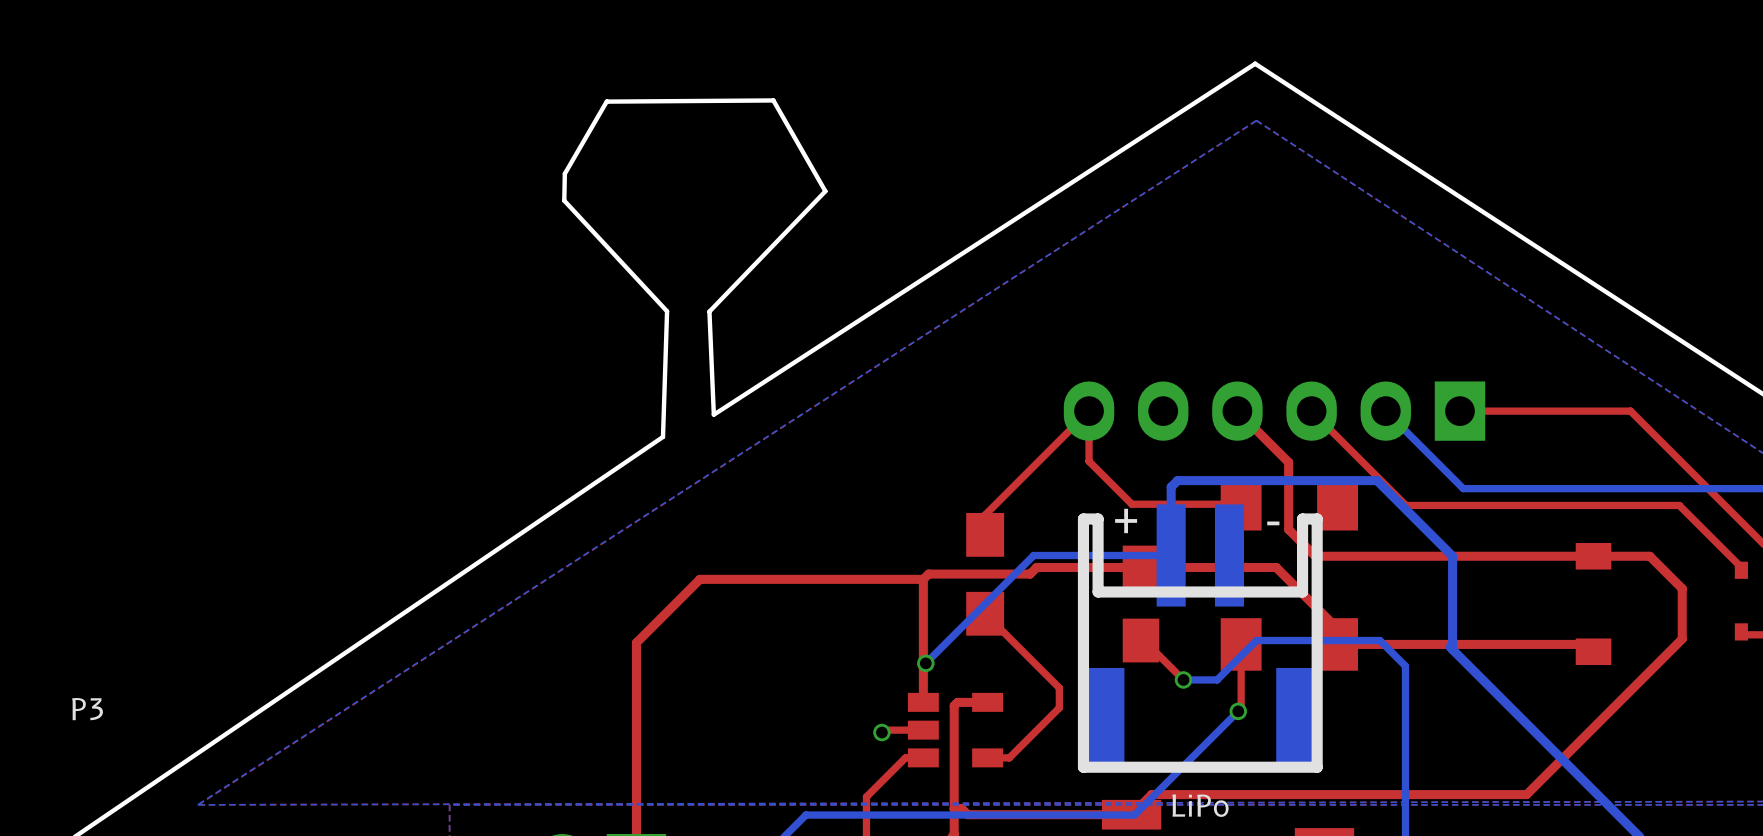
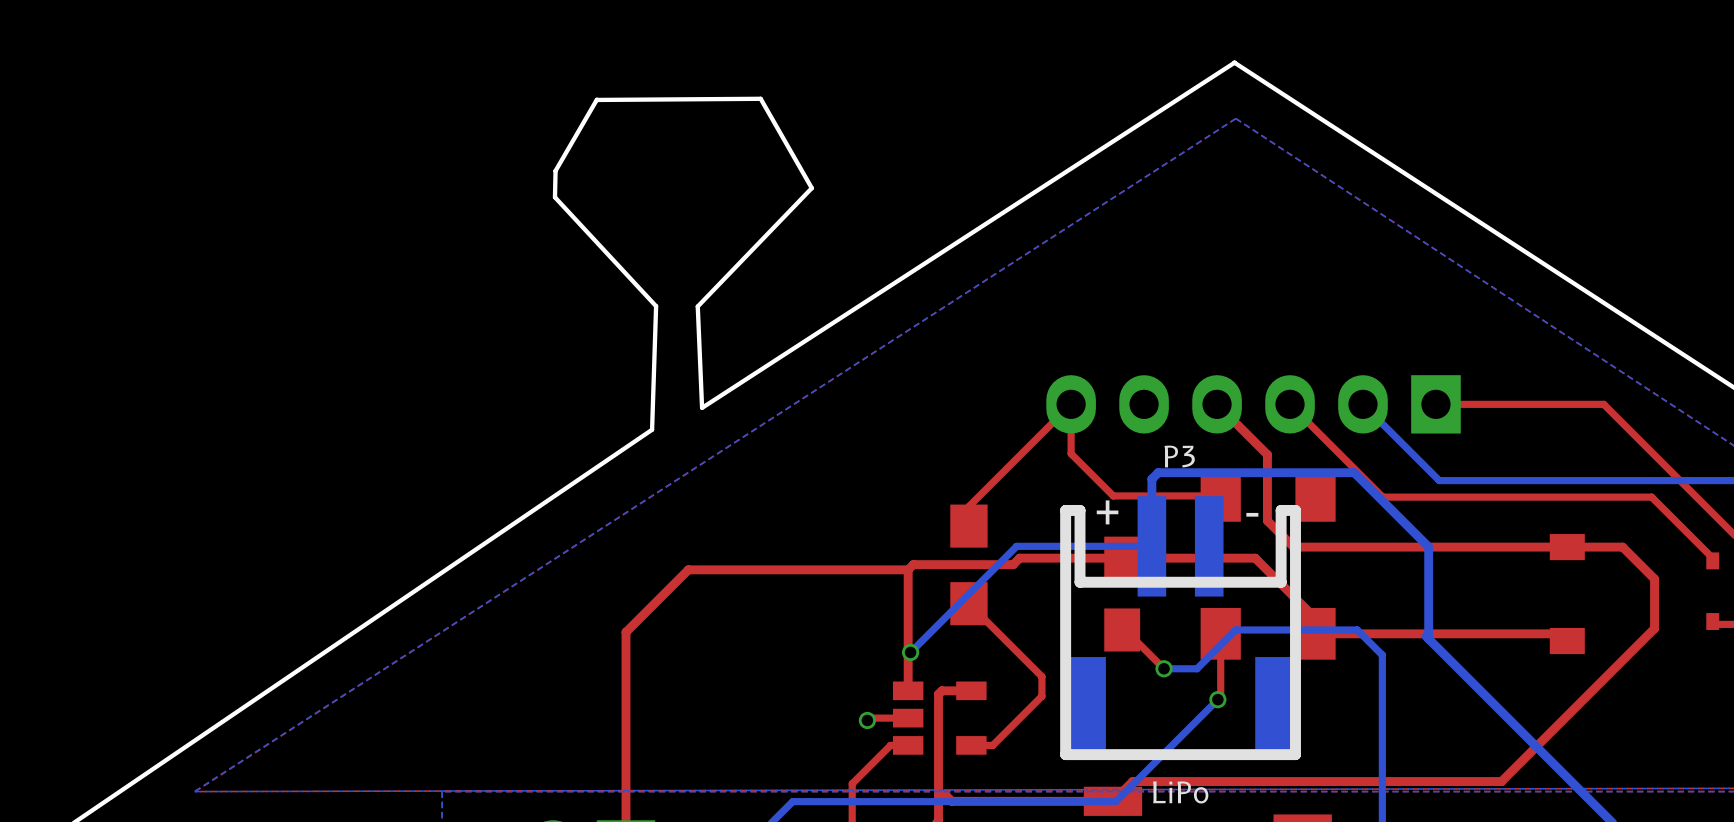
P3 name position: P3 (87, 709) -> P3 (1179, 456)

